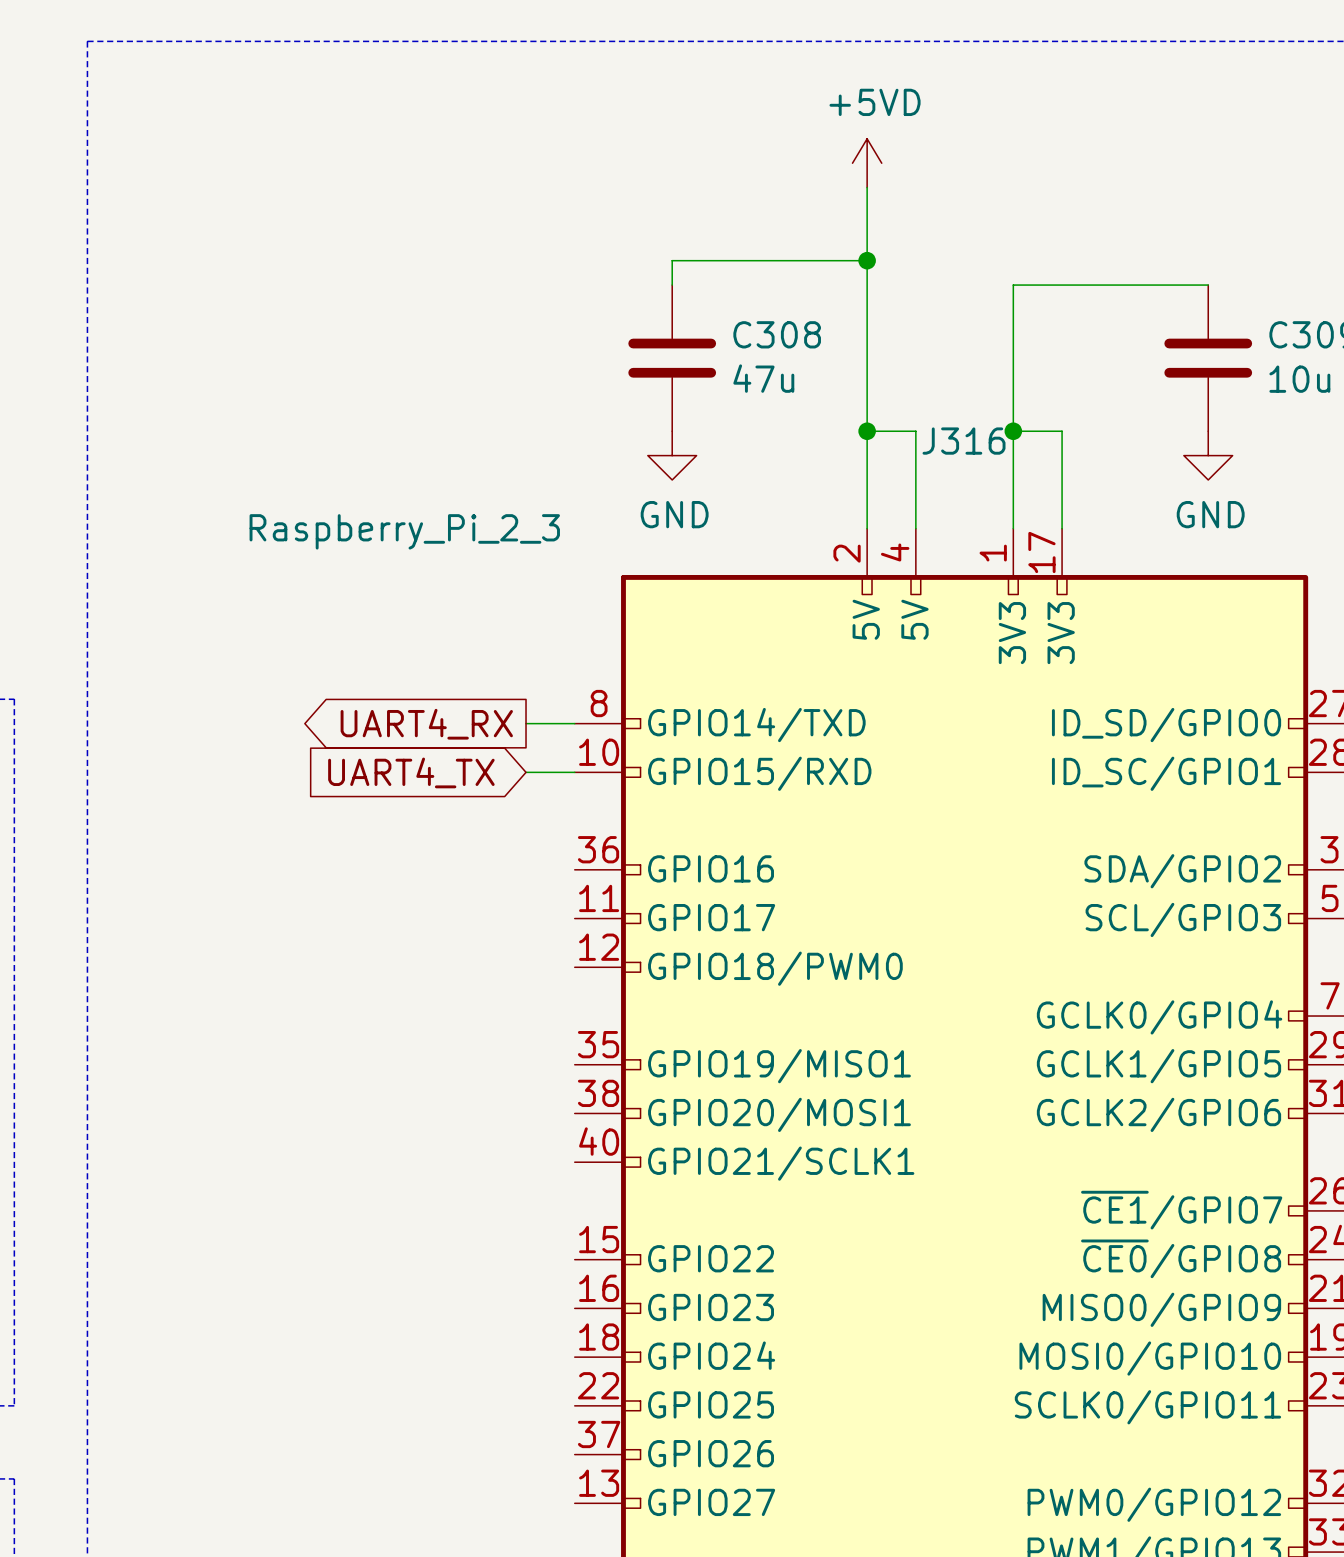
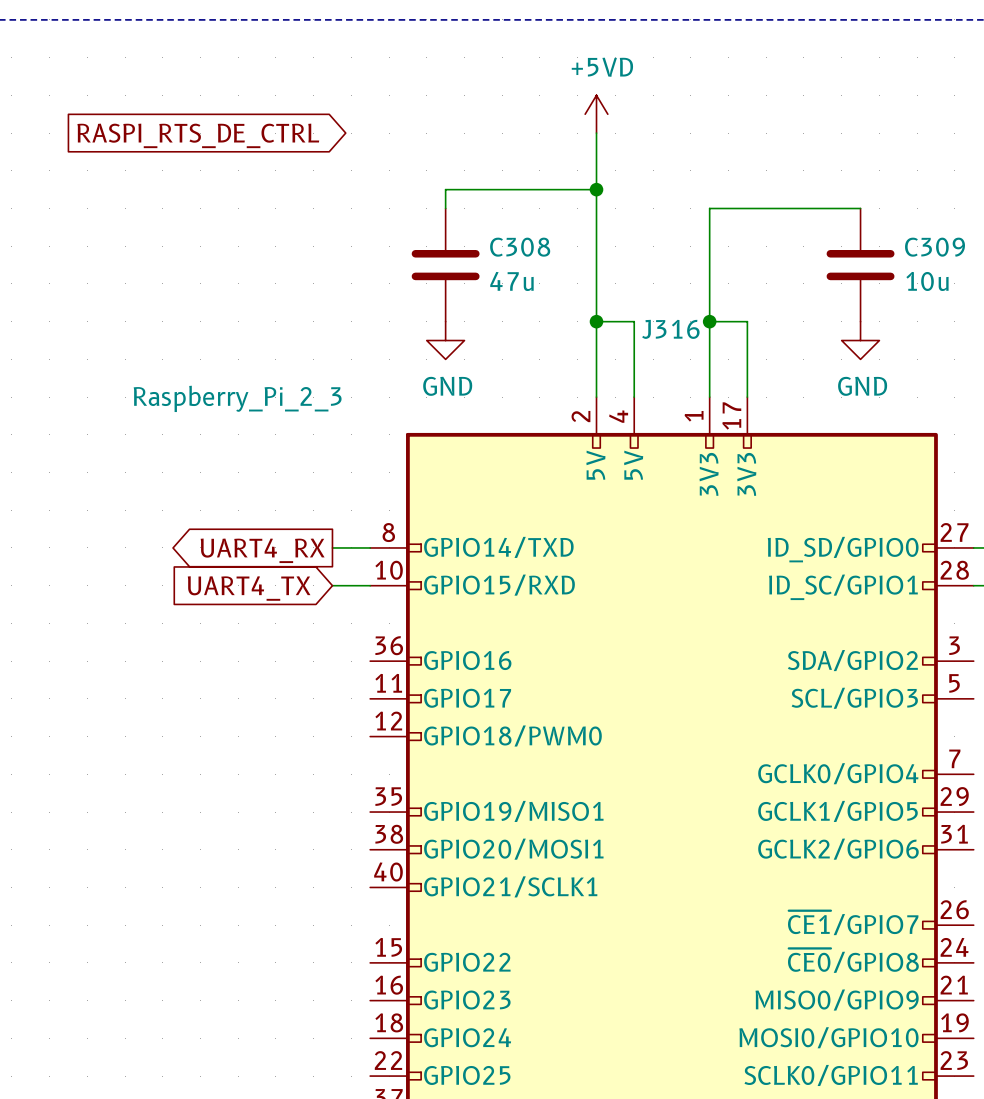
global label: none -> RASPI_RTS_DE_CTRL (198, 135)

